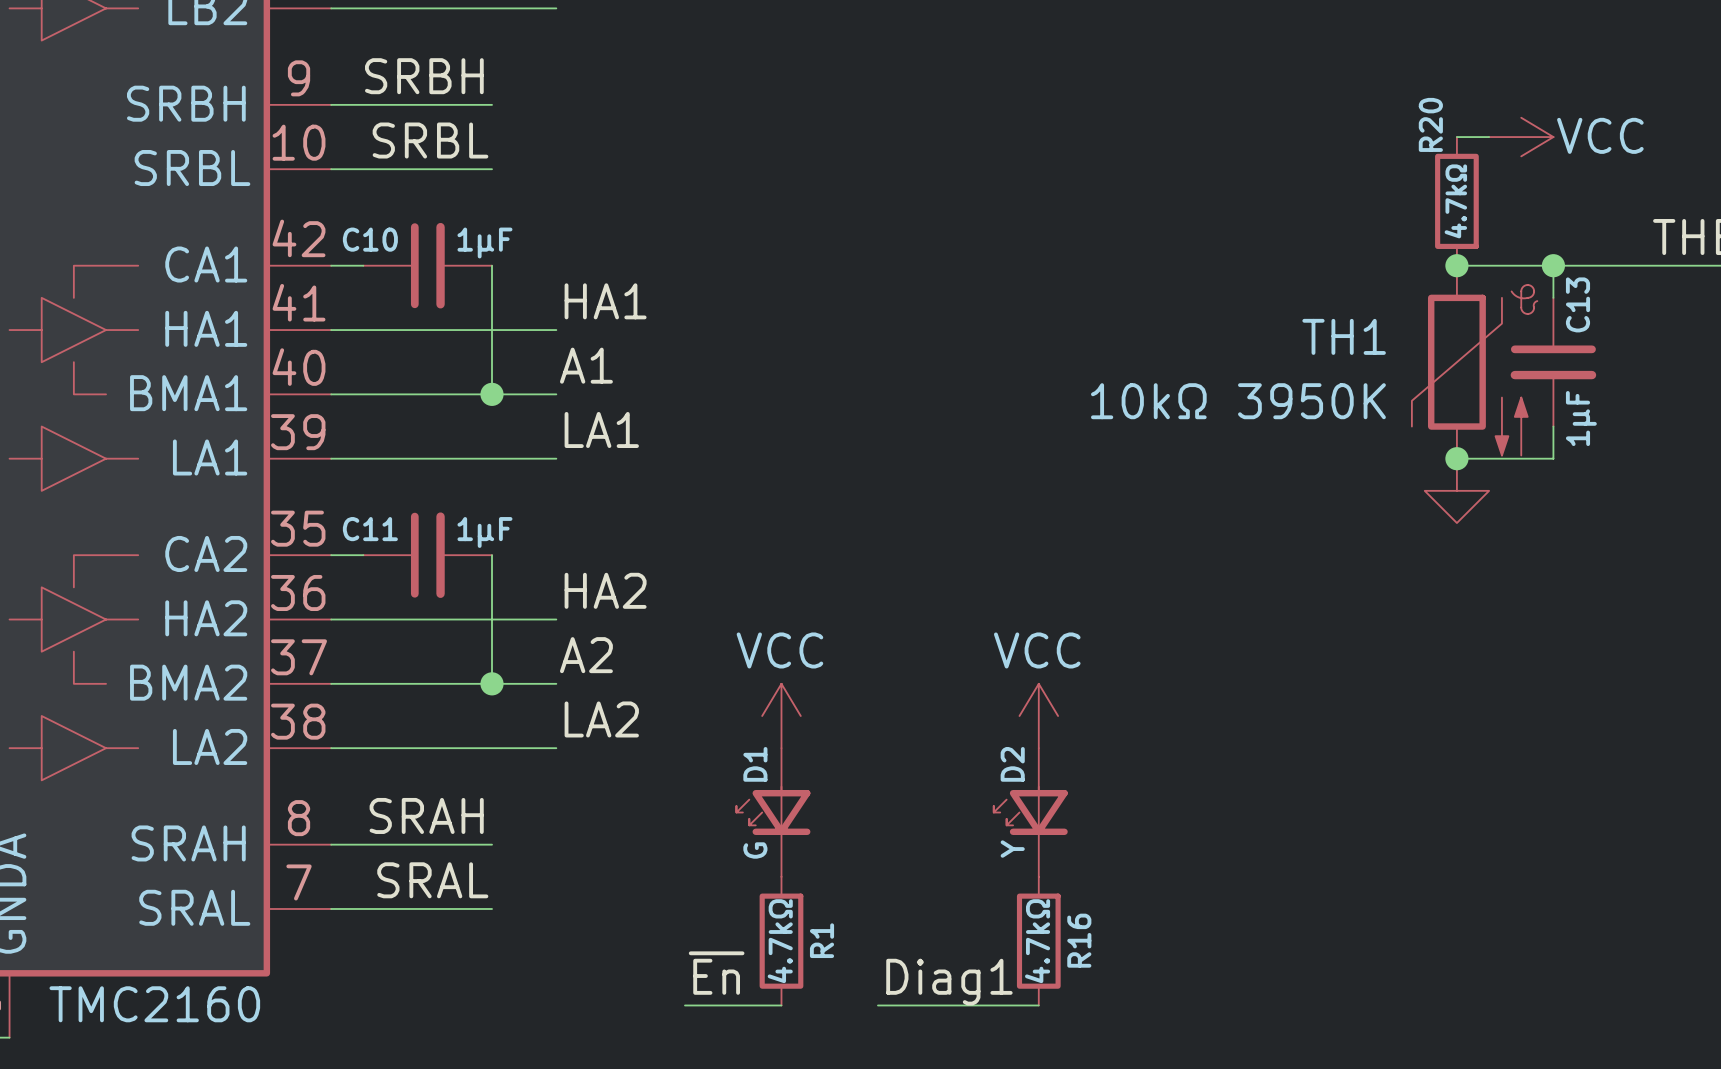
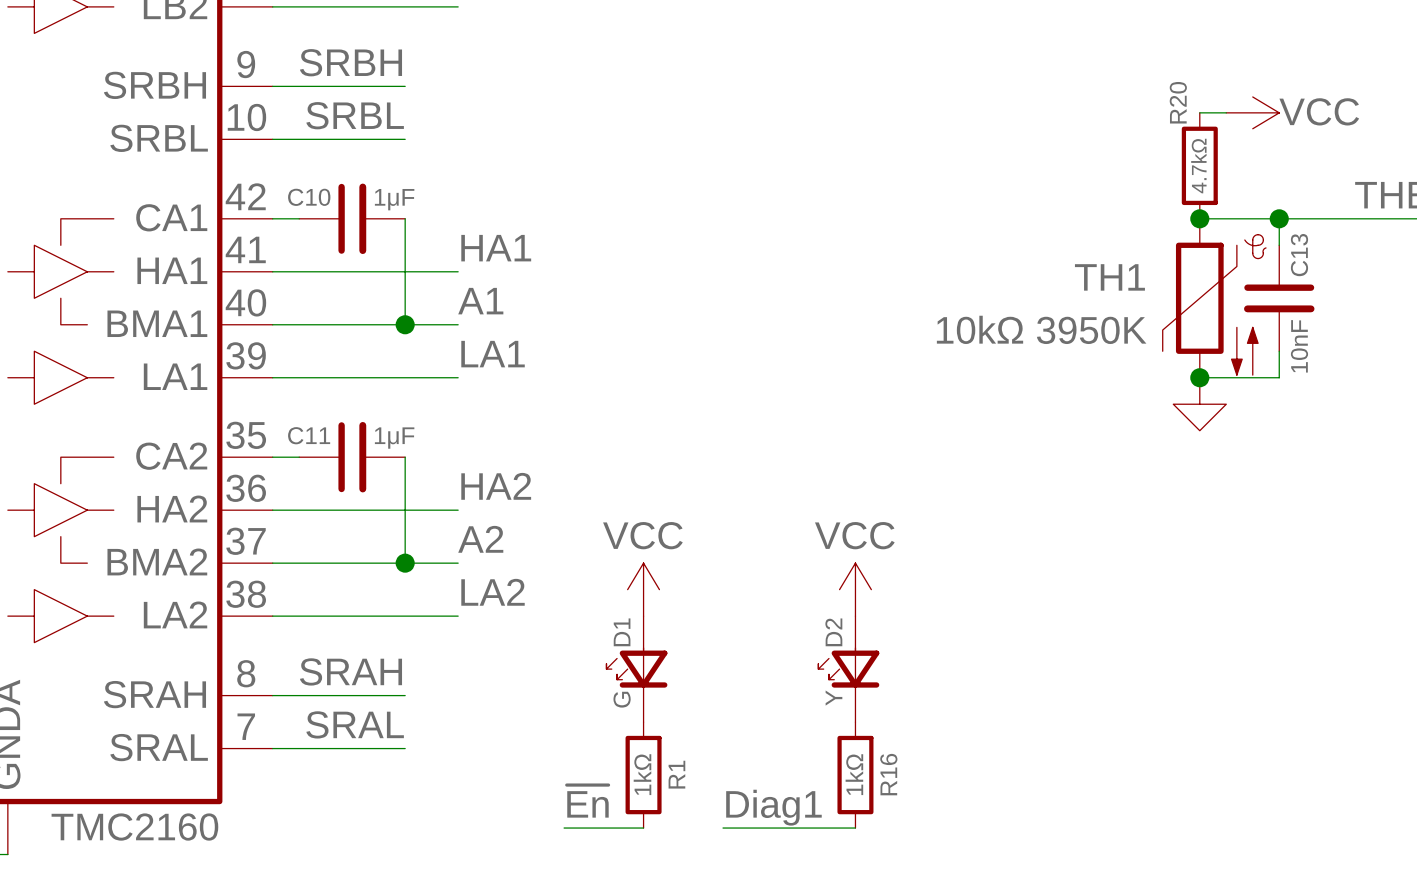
C13 value: 1μF (1581, 418) -> 10nF (1299, 346)
R1 value: 4.7kΩ (780, 941) -> 1kΩ (642, 774)
R16 value: 4.7kΩ (1037, 941) -> 1kΩ (854, 774)

